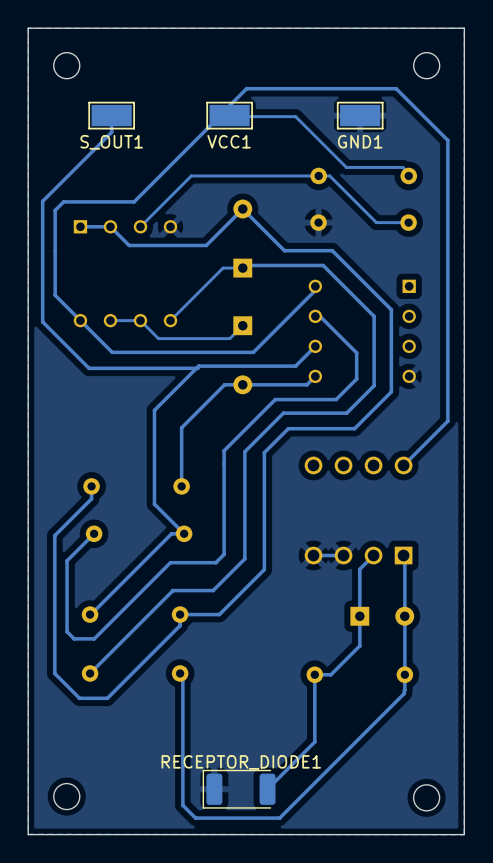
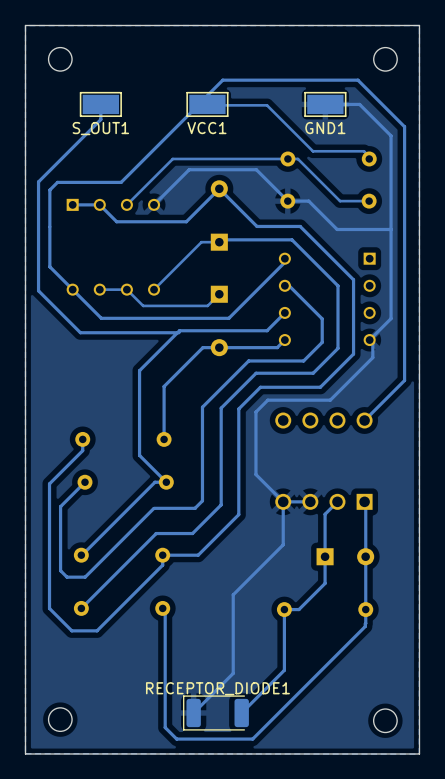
track: none -> (325, 104) (359, 104) (391, 135) (391, 318) (369, 340)
track: none -> (154, 204) (189, 169) (256, 169) (287, 201) (308, 201) (337, 229) (391, 229)
track: none -> (372, 343) (372, 357) (330, 400) (267, 400) (255, 412) (255, 474) (283, 501) (283, 544) (233, 594) (233, 673) (193, 712)

